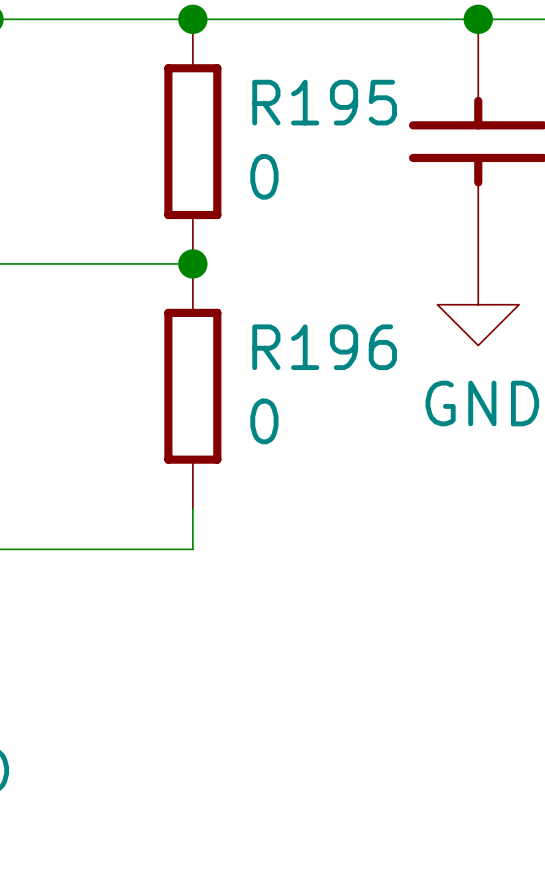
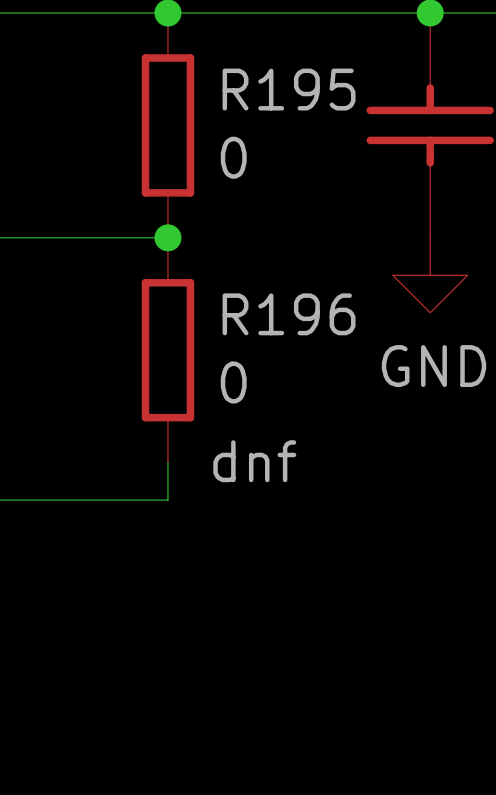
R196 text: none -> dnf (254, 461)

